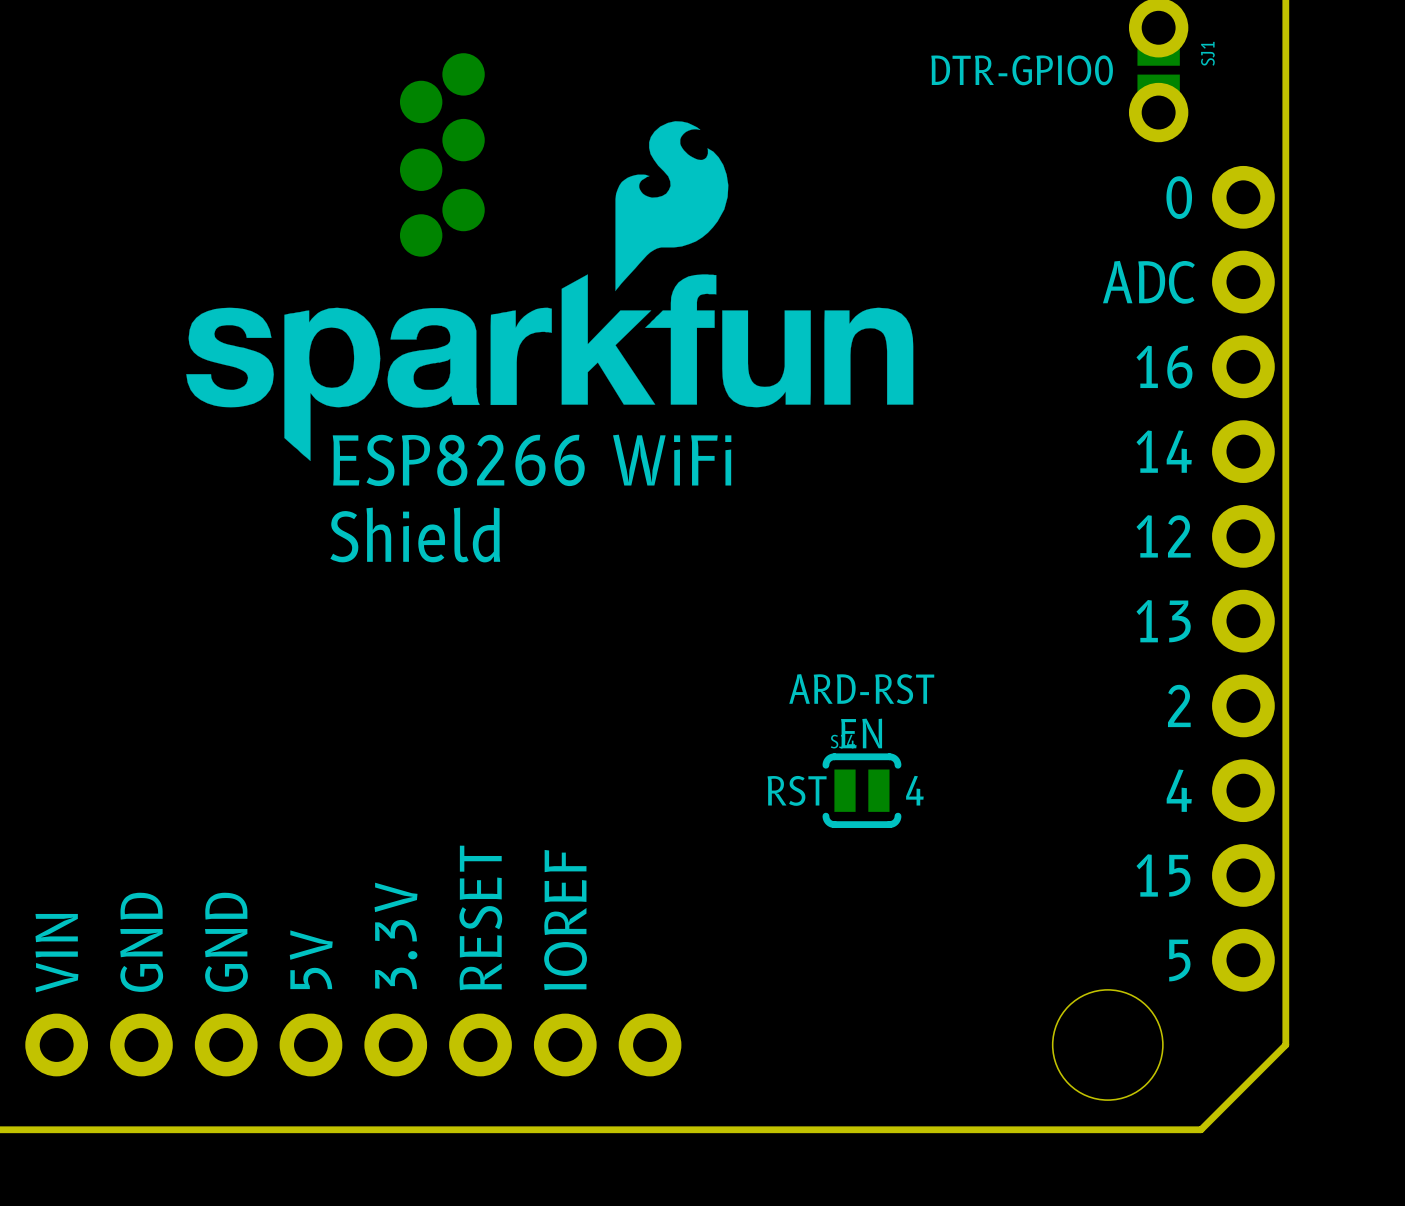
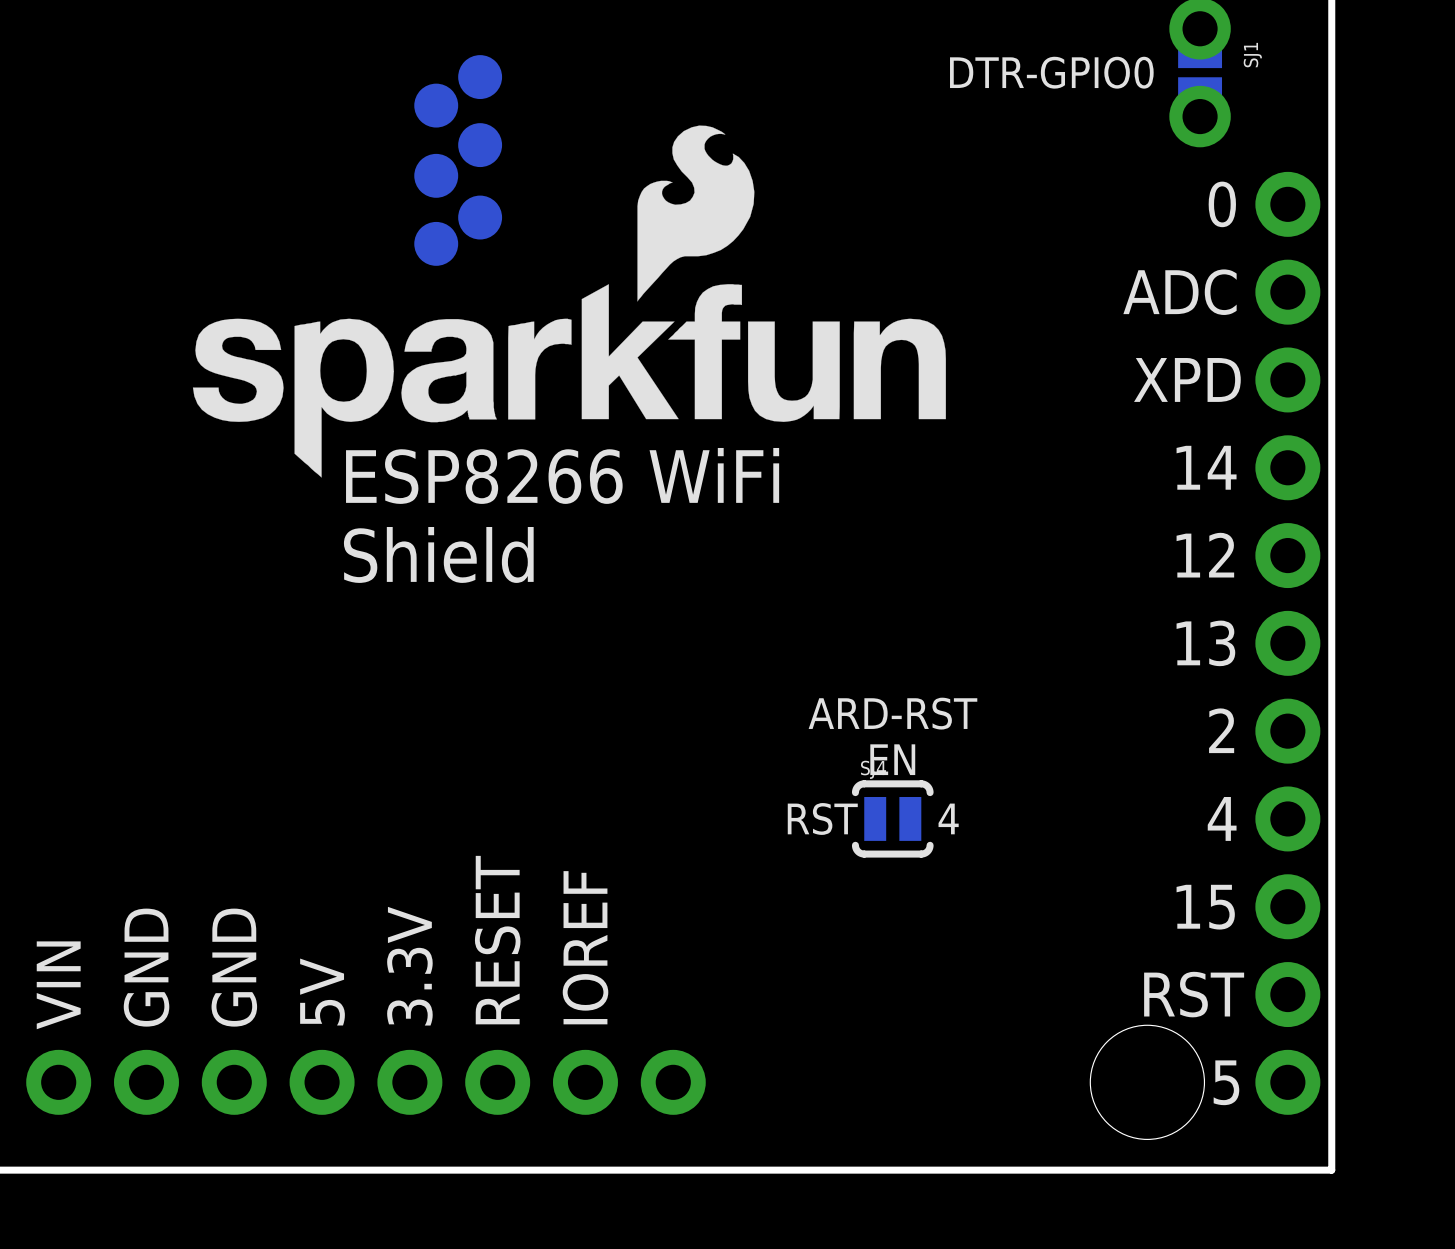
text: 16 (1164, 367) -> XPD (1187, 379)
part: none -> (1287, 643)
text: 5 (1179, 960) -> RST (1194, 994)
board edge: (1285, 1044) (1201, 1129) -> (1331, 1082) (1331, 1170) (1243, 1170)
text: none -> 5 (1226, 1082)

